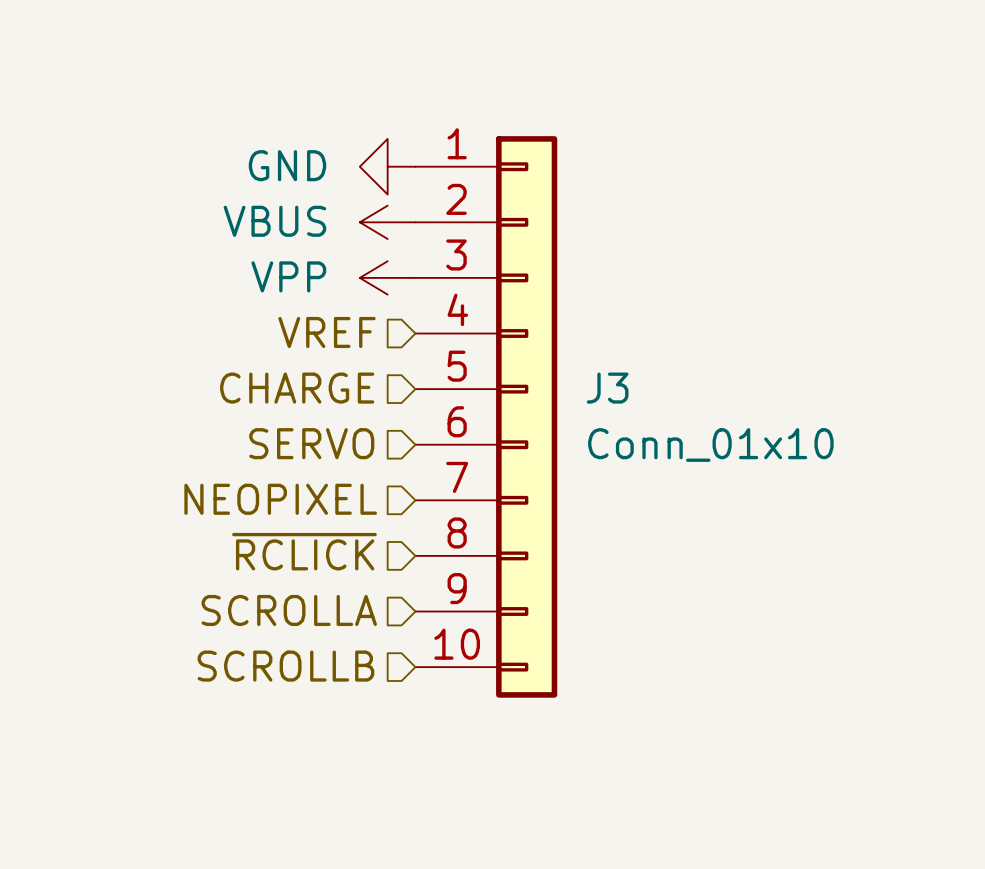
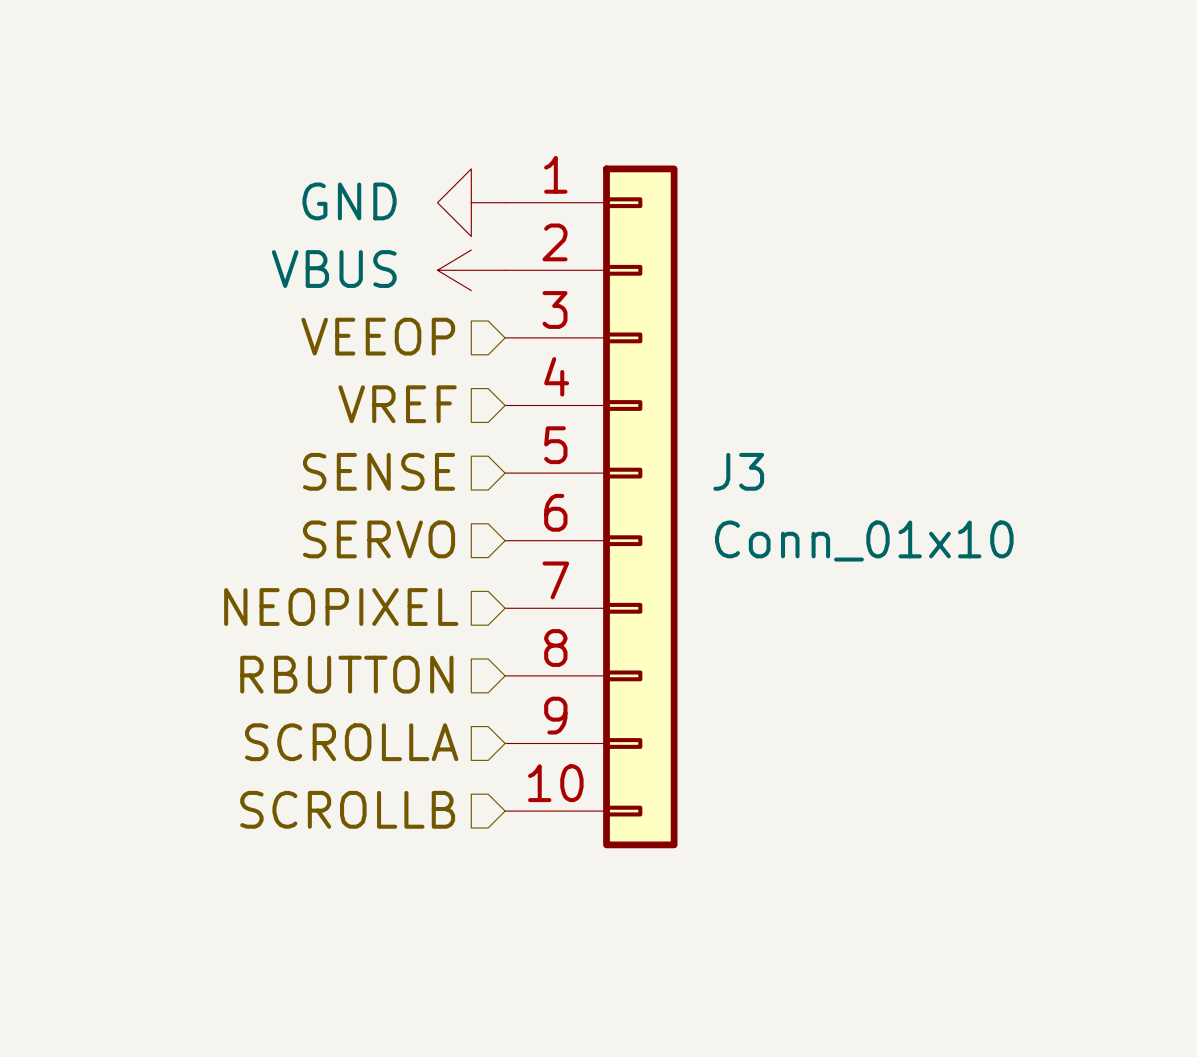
hierarchical label: none -> VEEOP (378, 336)
power symbol: VPP (387, 277) -> none
hierarchical label: CHARGE (297, 388) -> SENSE (379, 471)
hierarchical label: ~{RCLICK} (304, 551) -> RBUTTON (346, 674)

